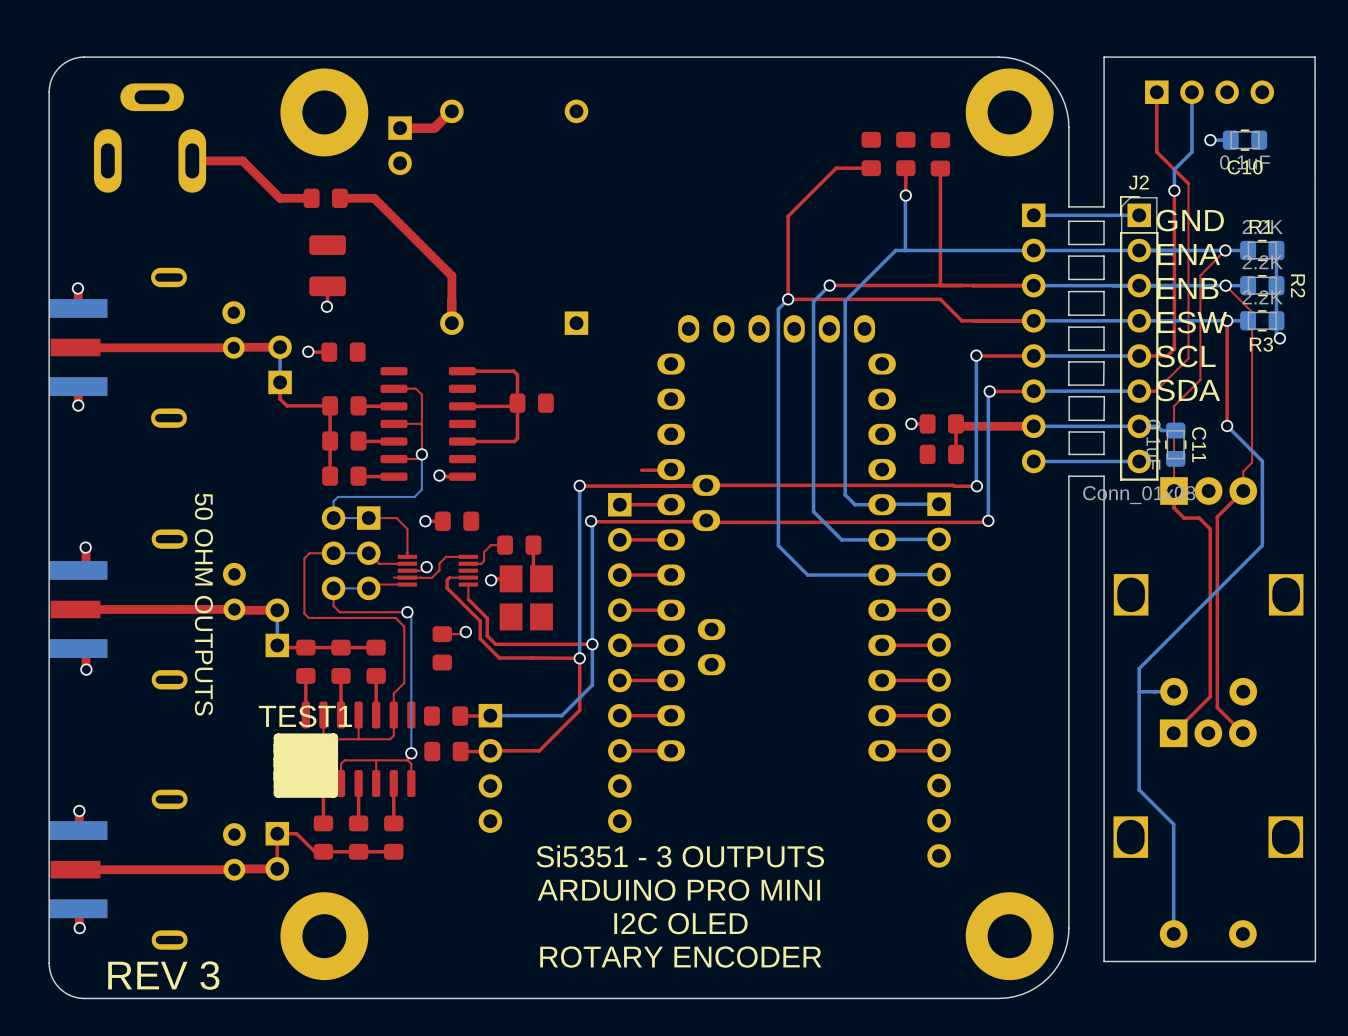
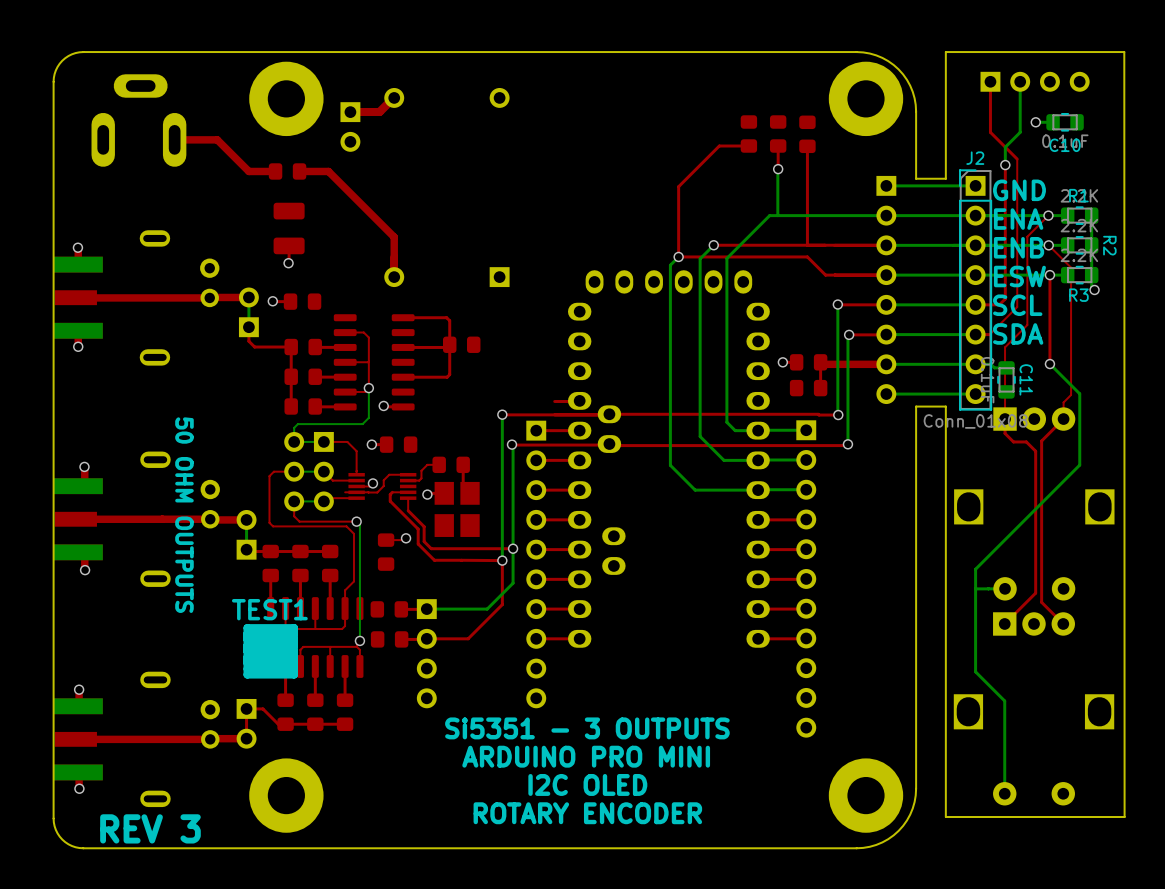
board edge: (1104, 221) (1104, 244) (1068, 244) (1068, 221) (1104, 221) -> none
board edge: (1104, 256) (1104, 279) (1068, 279) (1068, 256) (1104, 256) -> none
board edge: (1104, 291) (1104, 315) (1068, 315) (1068, 291) (1104, 291) -> none
board edge: (1104, 327) (1104, 350) (1068, 350) (1068, 327) (1104, 327) -> none
board edge: (1104, 361) (1103, 385) (1068, 385) (1068, 361) (1104, 361) -> none
board edge: (1104, 396) (1104, 420) (1069, 420) (1069, 396) (1104, 396) -> none
board edge: (1104, 432) (1104, 454) (1069, 454) (1069, 432) (1104, 432) -> none

